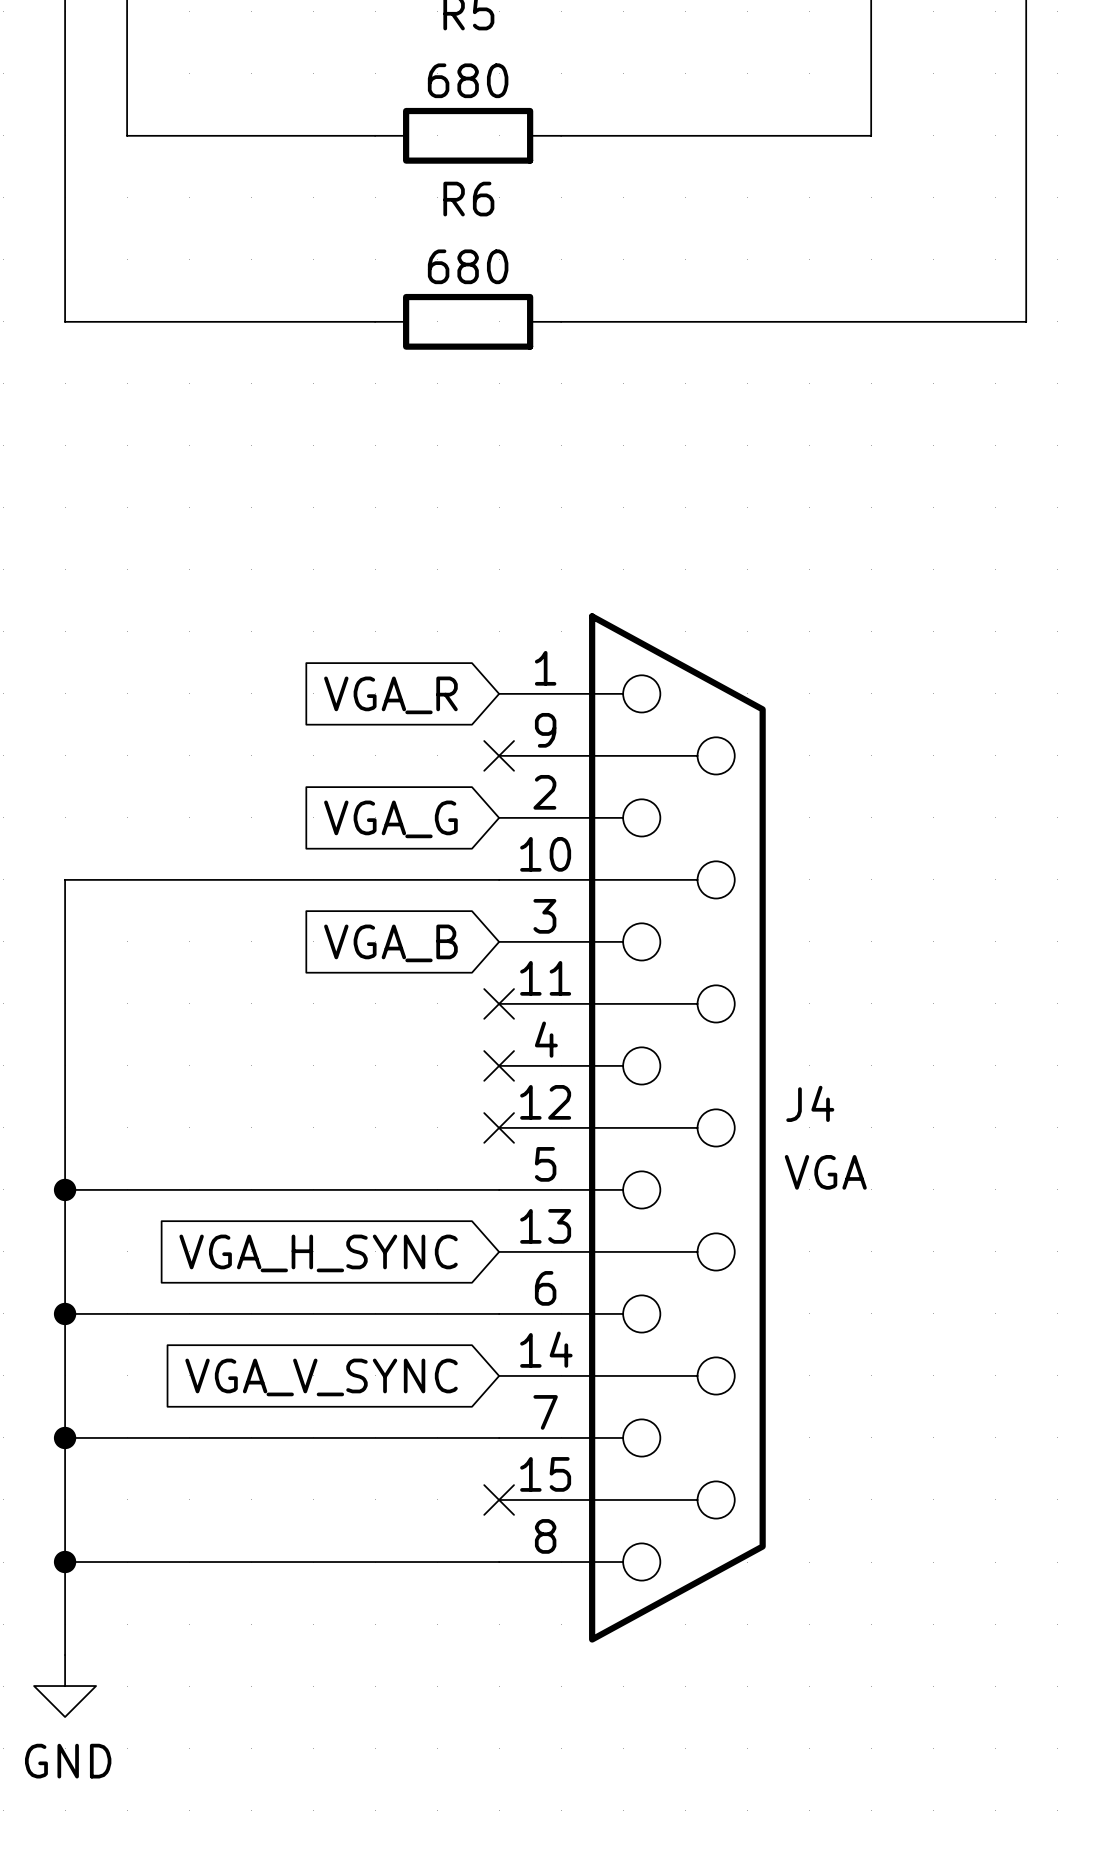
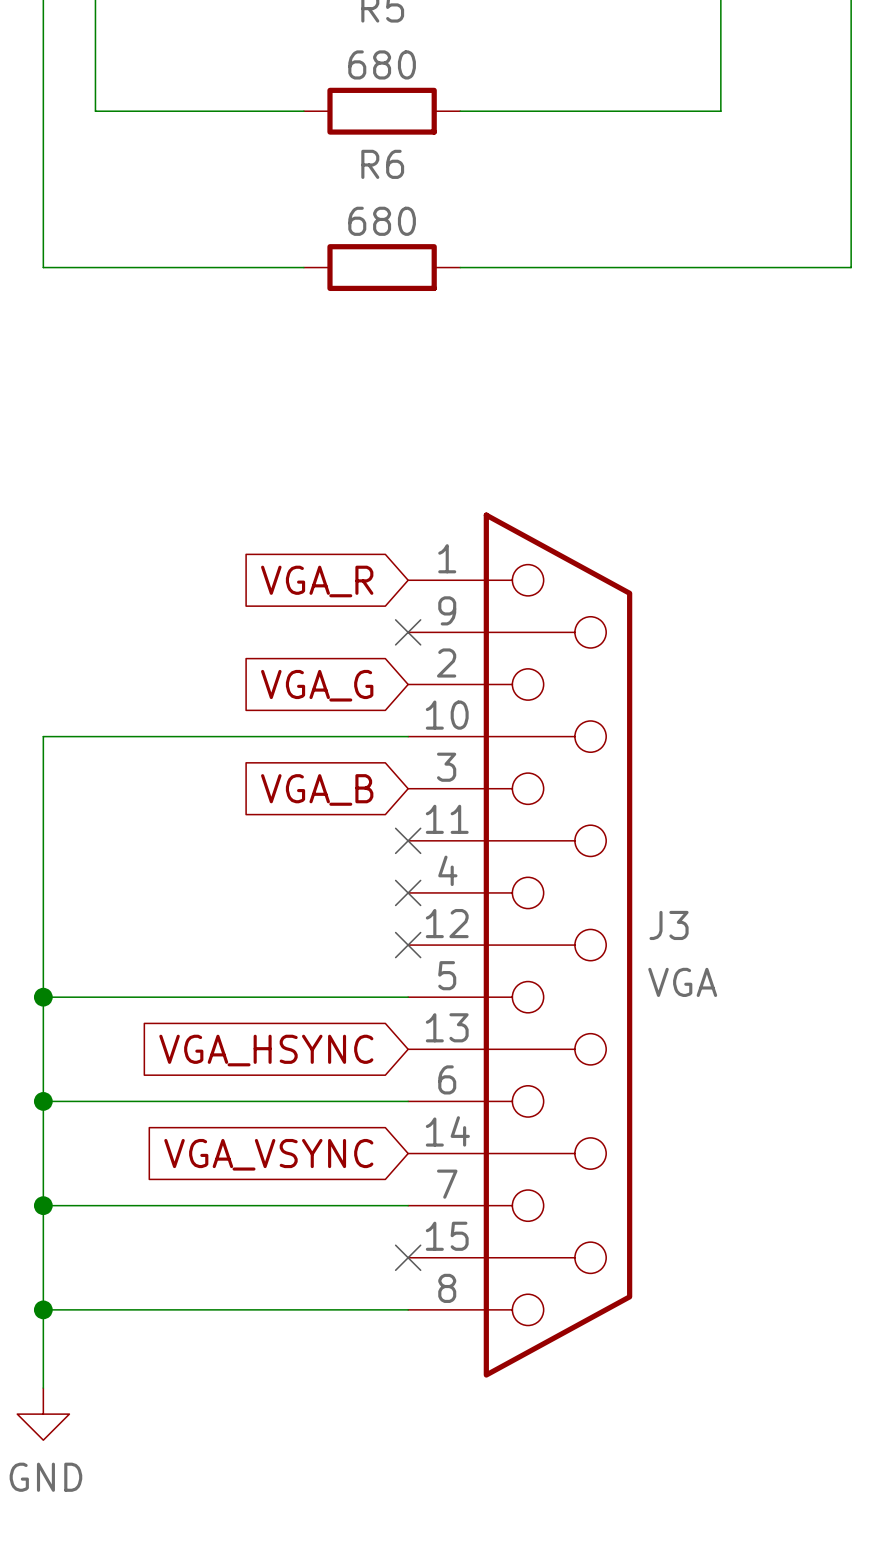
J4 name: J4 (810, 1103) -> J3 (669, 925)
global label: VGA_H_SYNC (318, 1253) -> VGA_HSYNC (266, 1050)
global label: VGA_V_SYNC (321, 1377) -> VGA_VSYNC (268, 1154)

